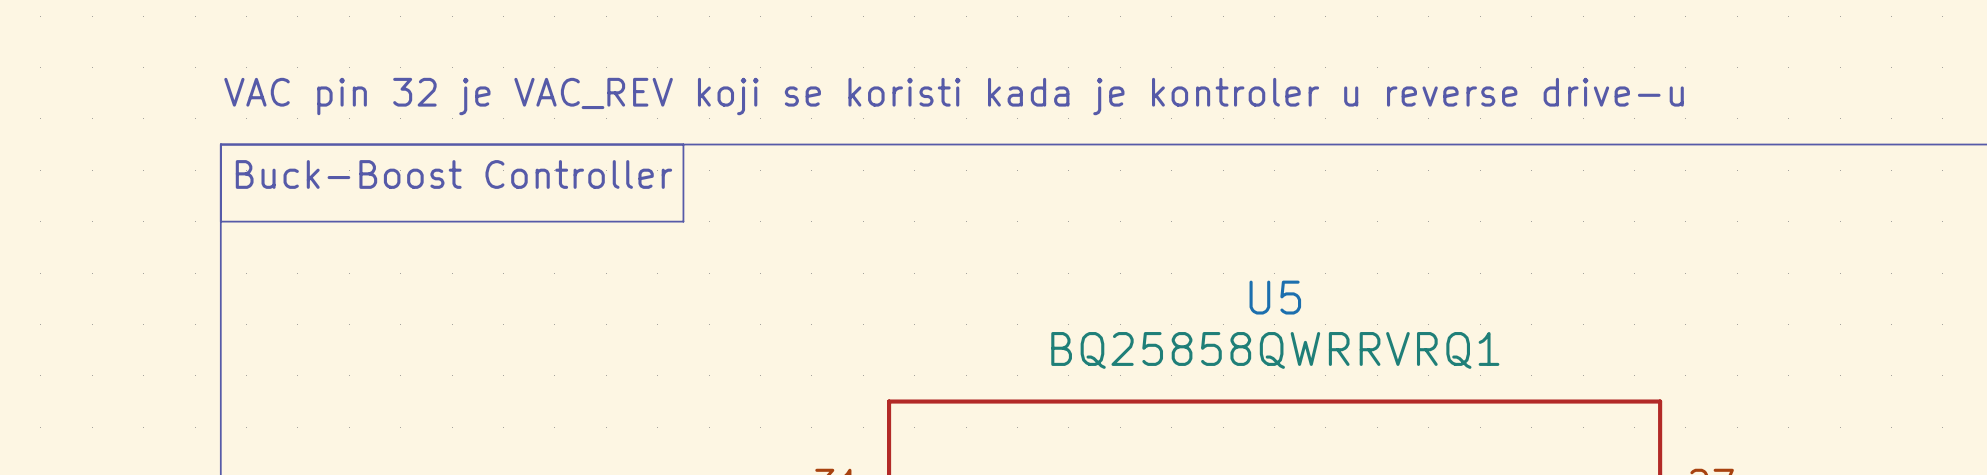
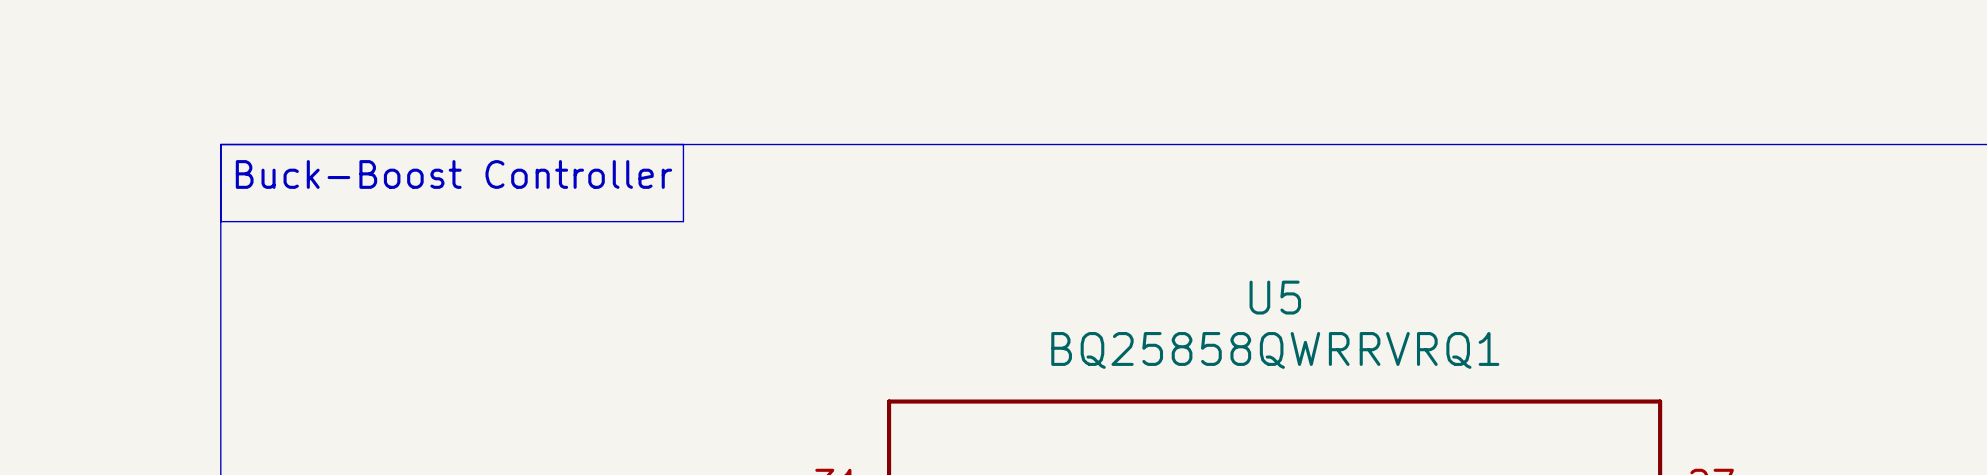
text: VAC pin 32 je VAC_REV koji se koristi kada je kontroler u reverse drive-u (954, 96) -> none

